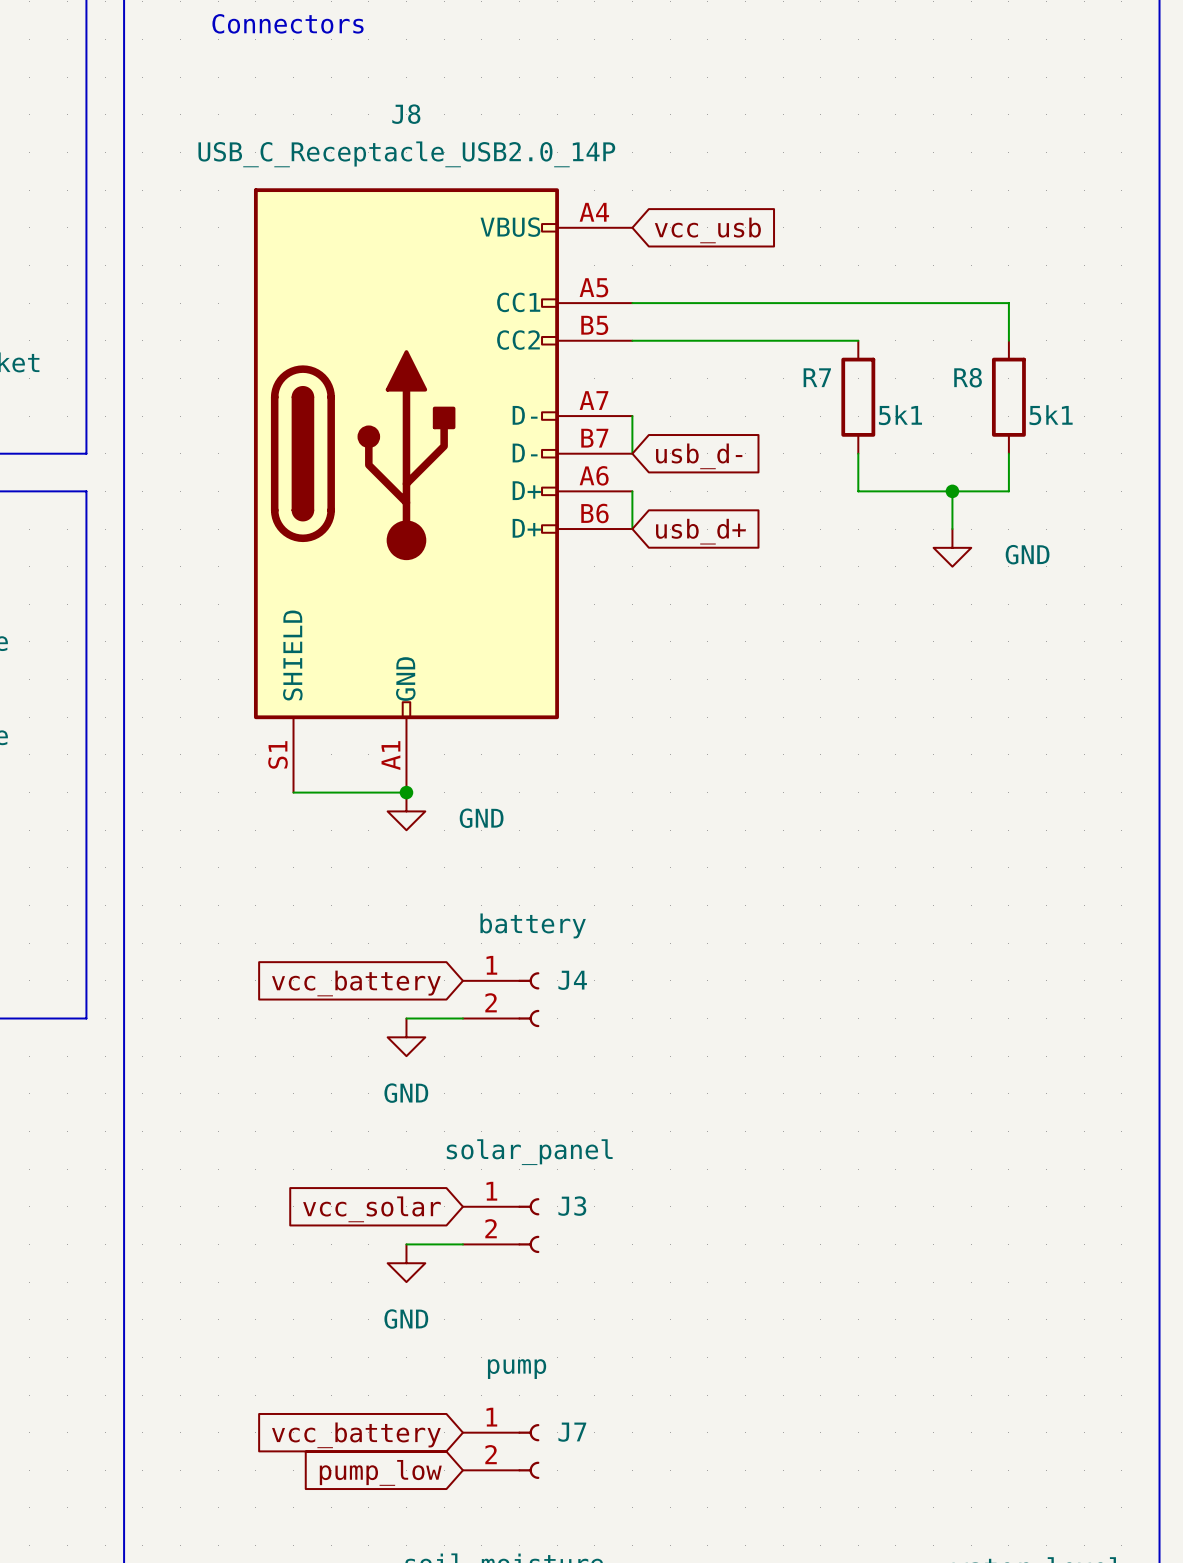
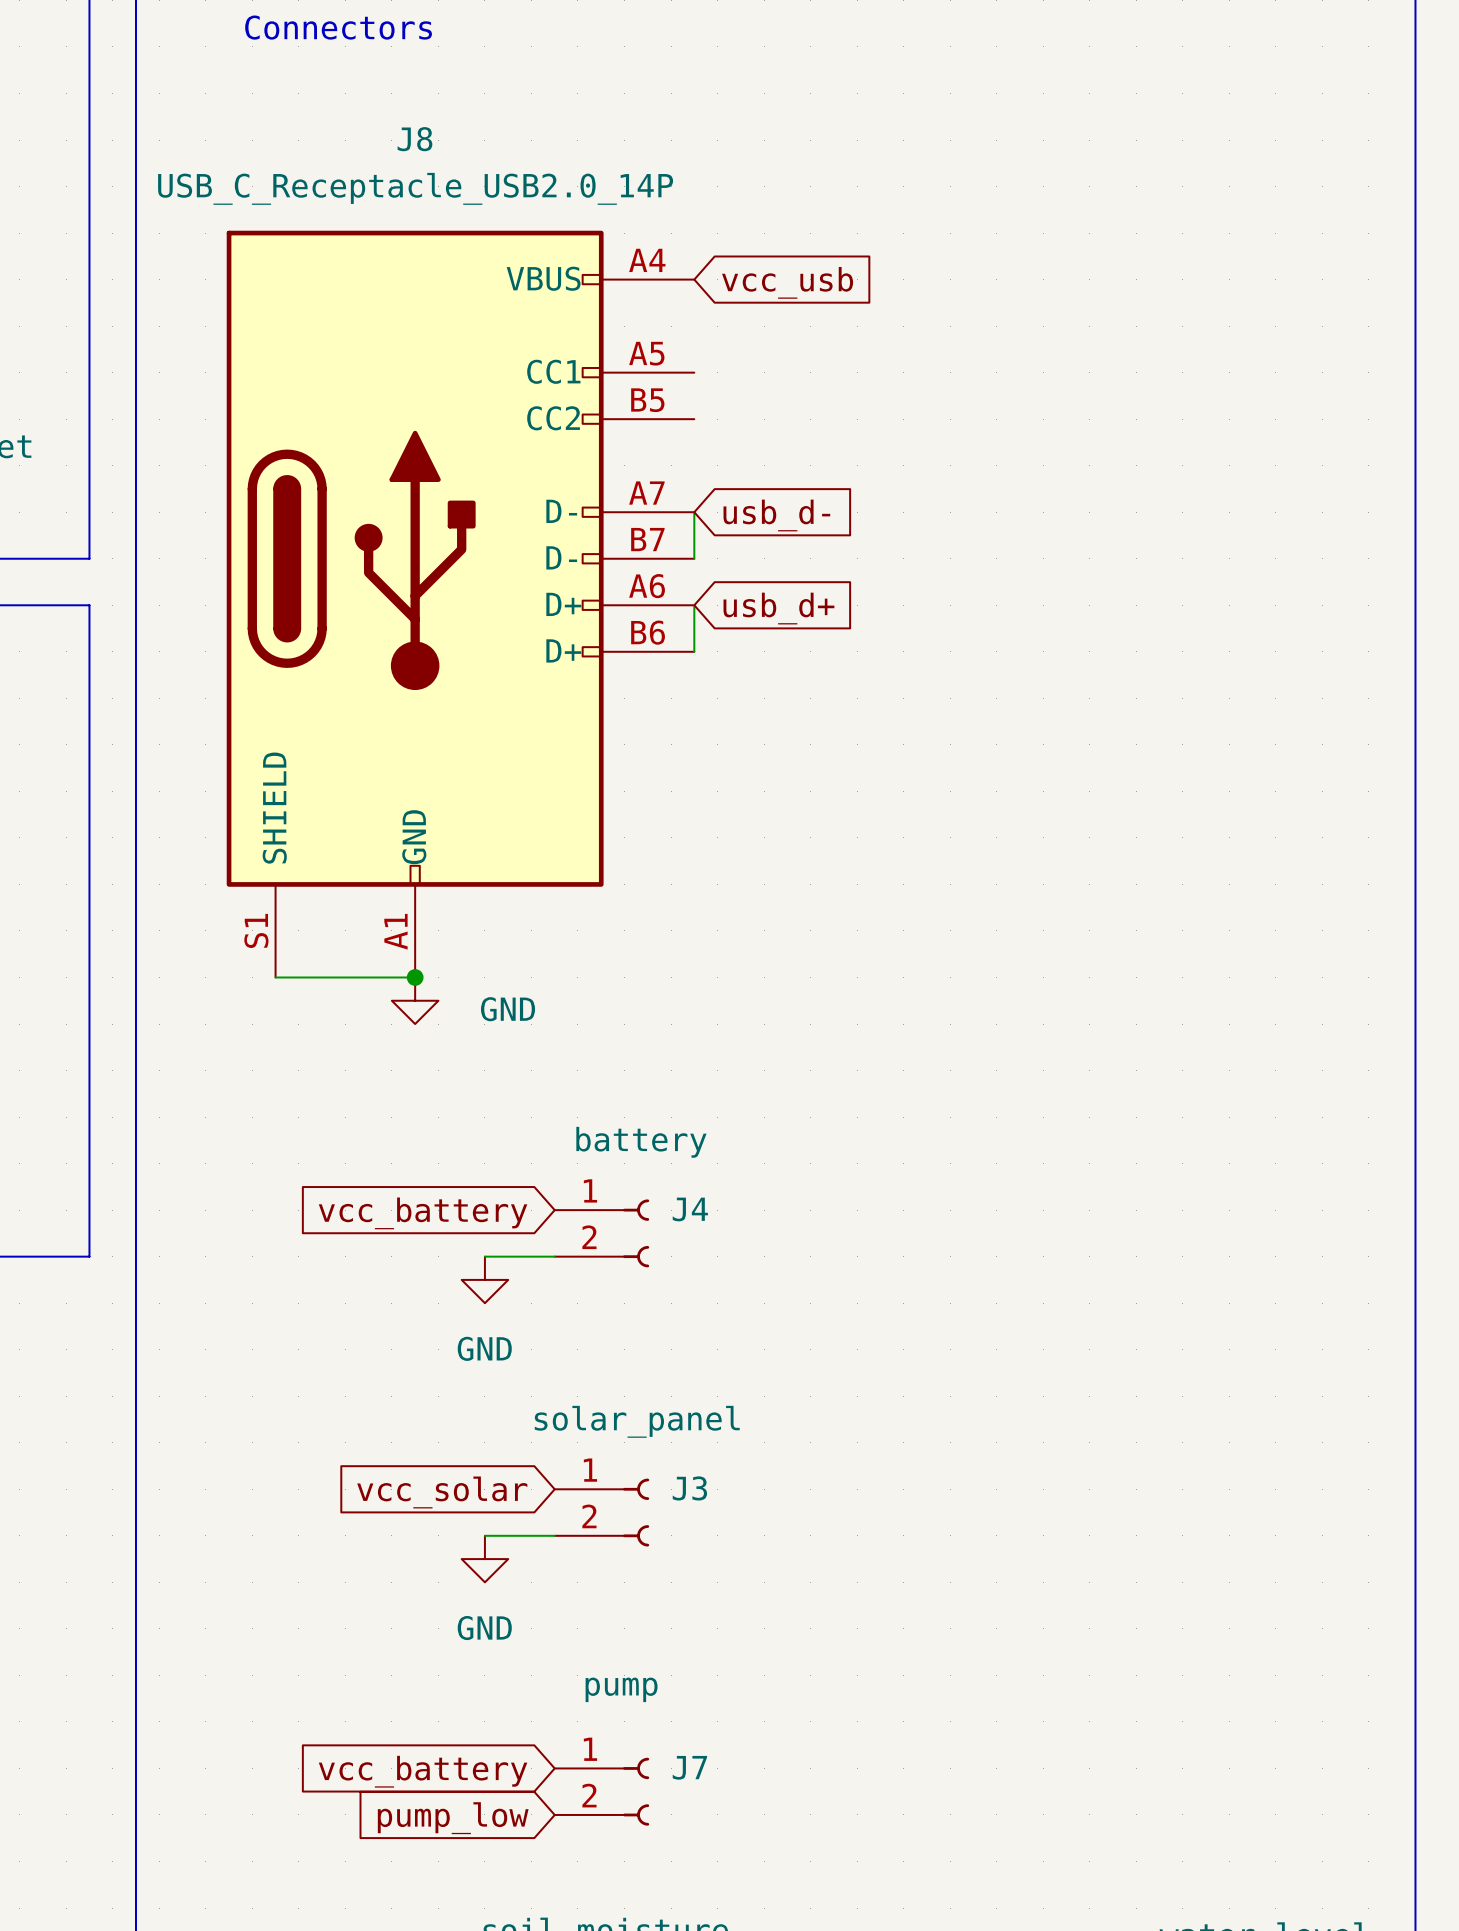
global label position: vcc_usb (707, 230) -> vcc_usb (787, 282)
wire: (632, 303) (1008, 303) (1008, 340) -> none
wire: (632, 340) (858, 340) -> none
R7: 5k1 (858, 397) -> none
R8: 5k1 (1008, 397) -> none
wire: (632, 416) (632, 453) -> (694, 512) (694, 558)
wire: (858, 453) (858, 491) (1008, 491) (1008, 453) -> none
global label position: usb_d- (699, 456) -> usb_d- (776, 515)
J8 position: (443, 490) -> (460, 604)
wire: (632, 491) (632, 529) -> (694, 605) (694, 651)
wire: (952, 491) (952, 529) -> none
junction: (952, 491) -> none
global label position: usb_d+ (700, 531) -> usb_d+ (778, 608)
power symbol: GND (952, 547) -> none
wire: (349, 792) (406, 792) -> (275, 977) (345, 977)
junction position: (406, 792) -> (415, 977)
power symbol position: GND (406, 811) -> GND (415, 1000)

